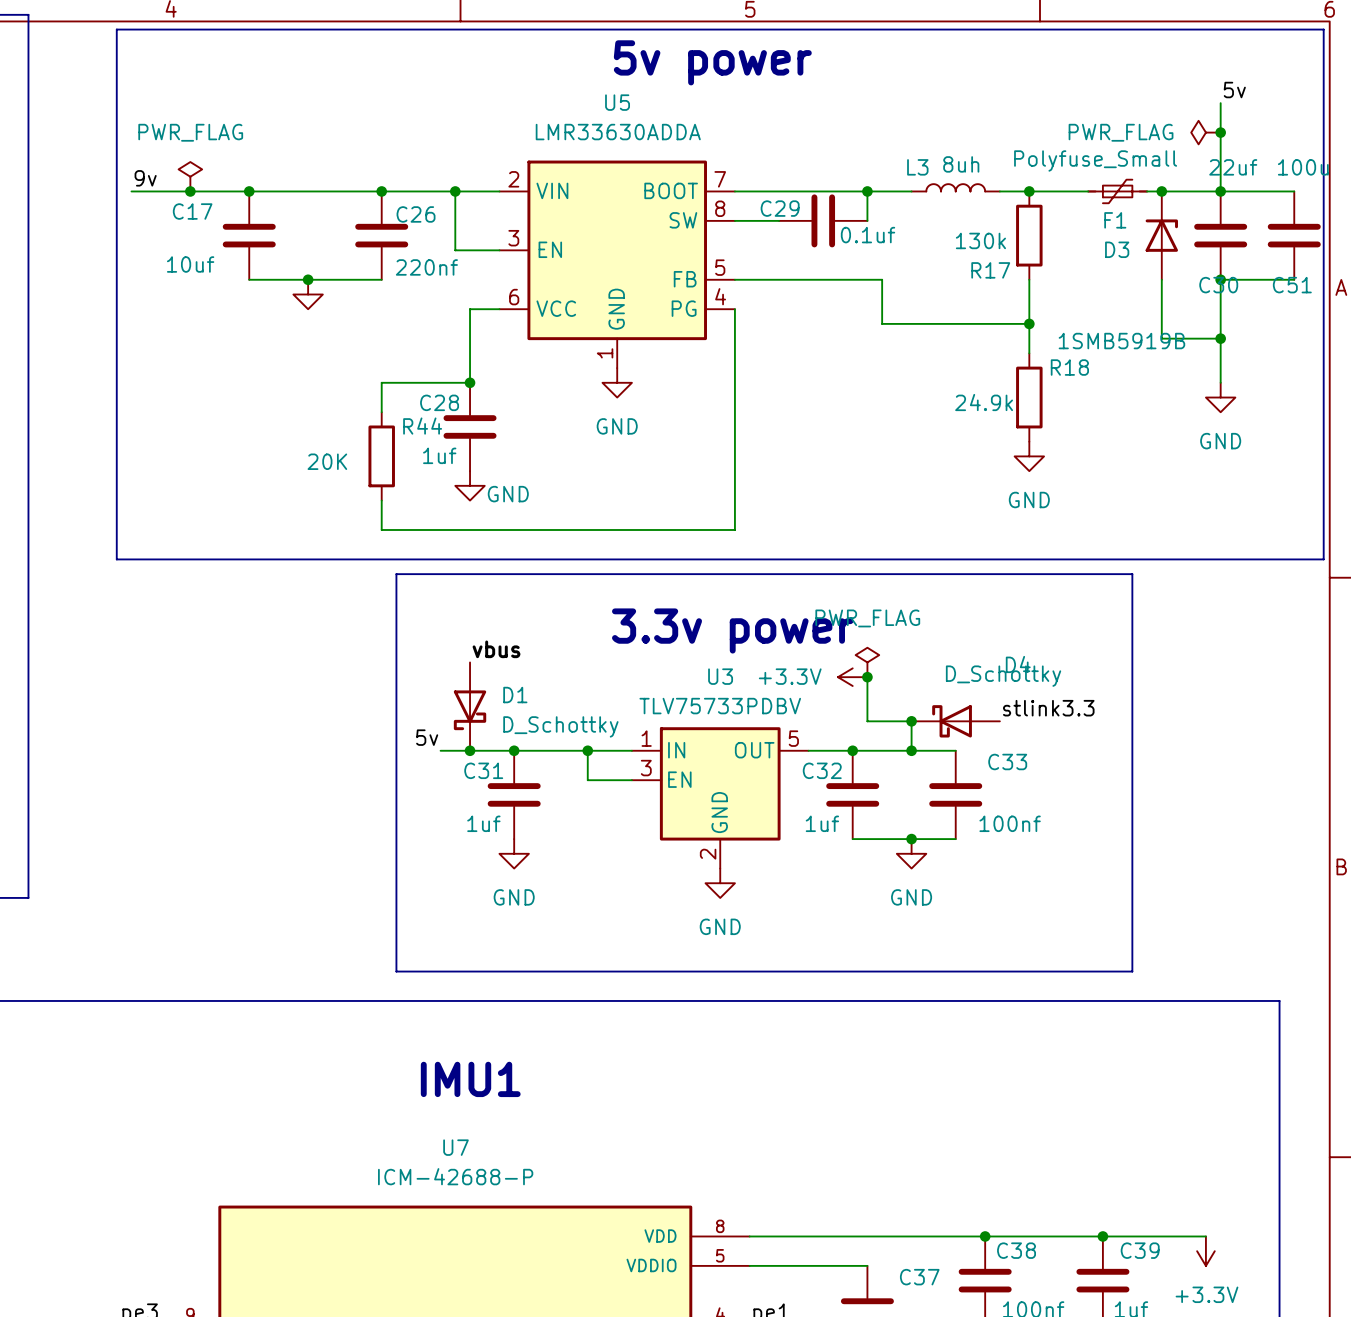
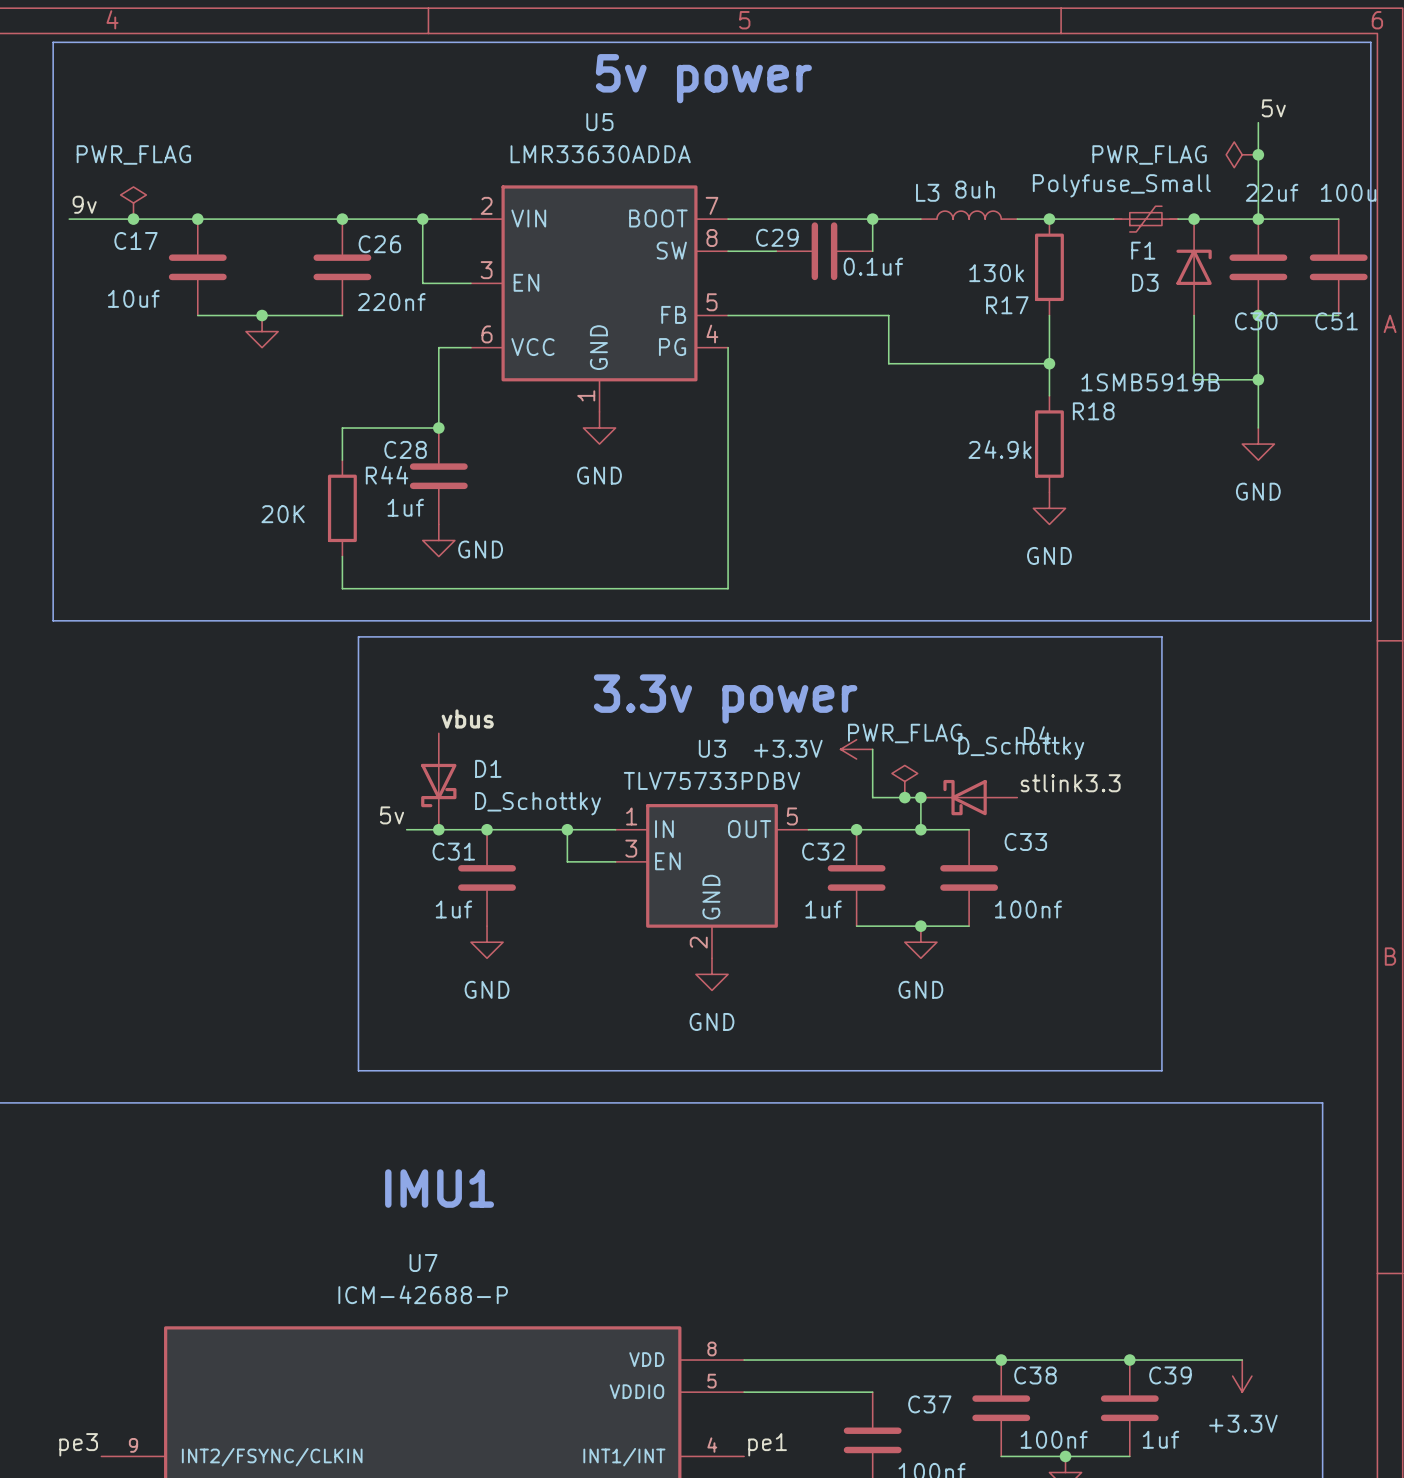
power symbol position: PWR_FLAG (867, 662) -> PWR_FLAG (904, 781)
junction position: (867, 677) -> (904, 797)

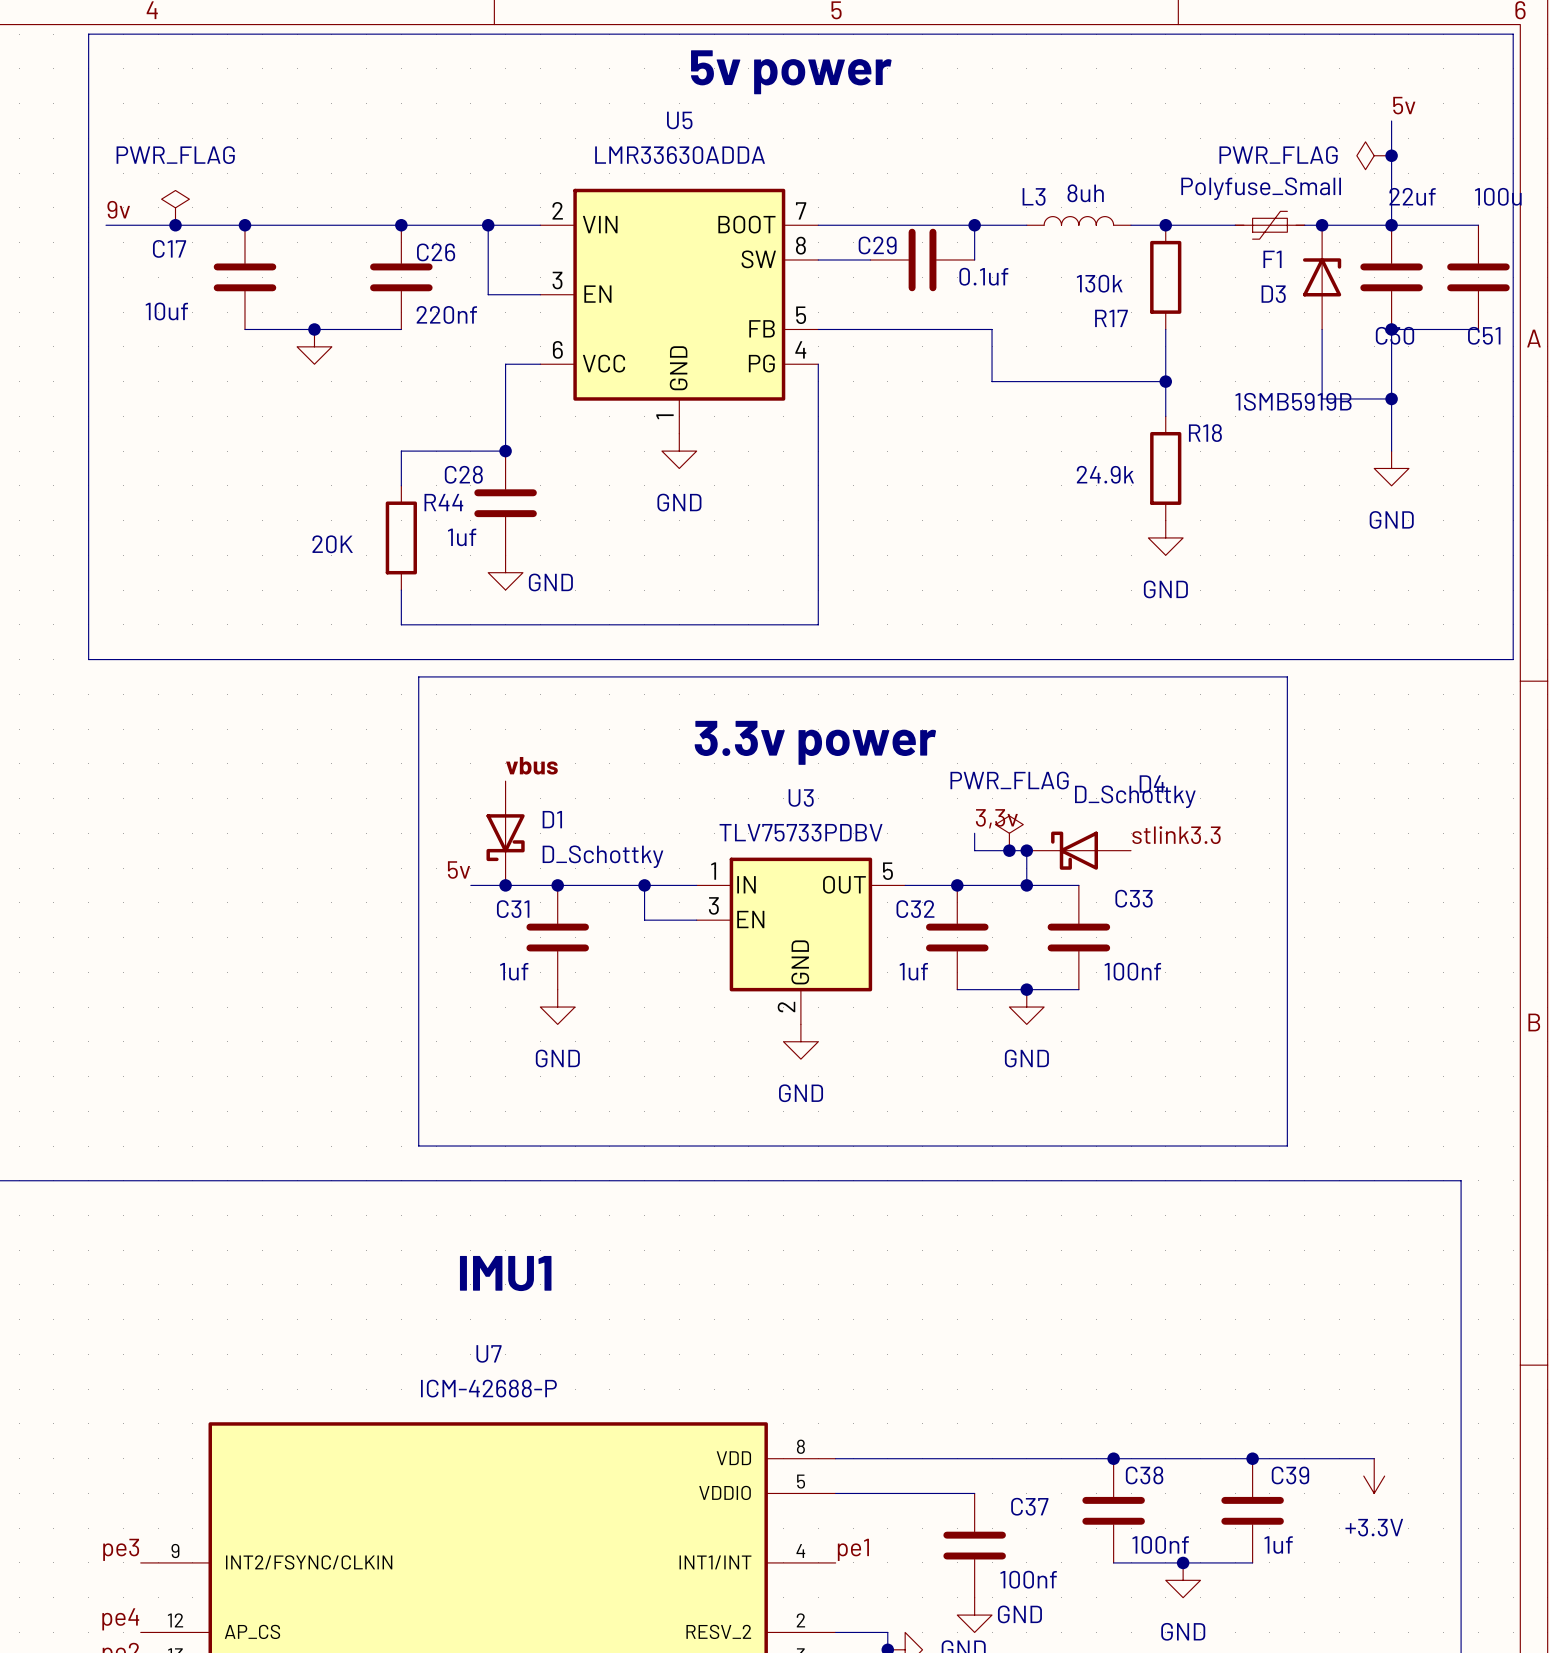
power symbol: +3.3V (856, 749) -> none
wire: (872, 749) (872, 781) -> none
label: none -> 3,3v (996, 818)

